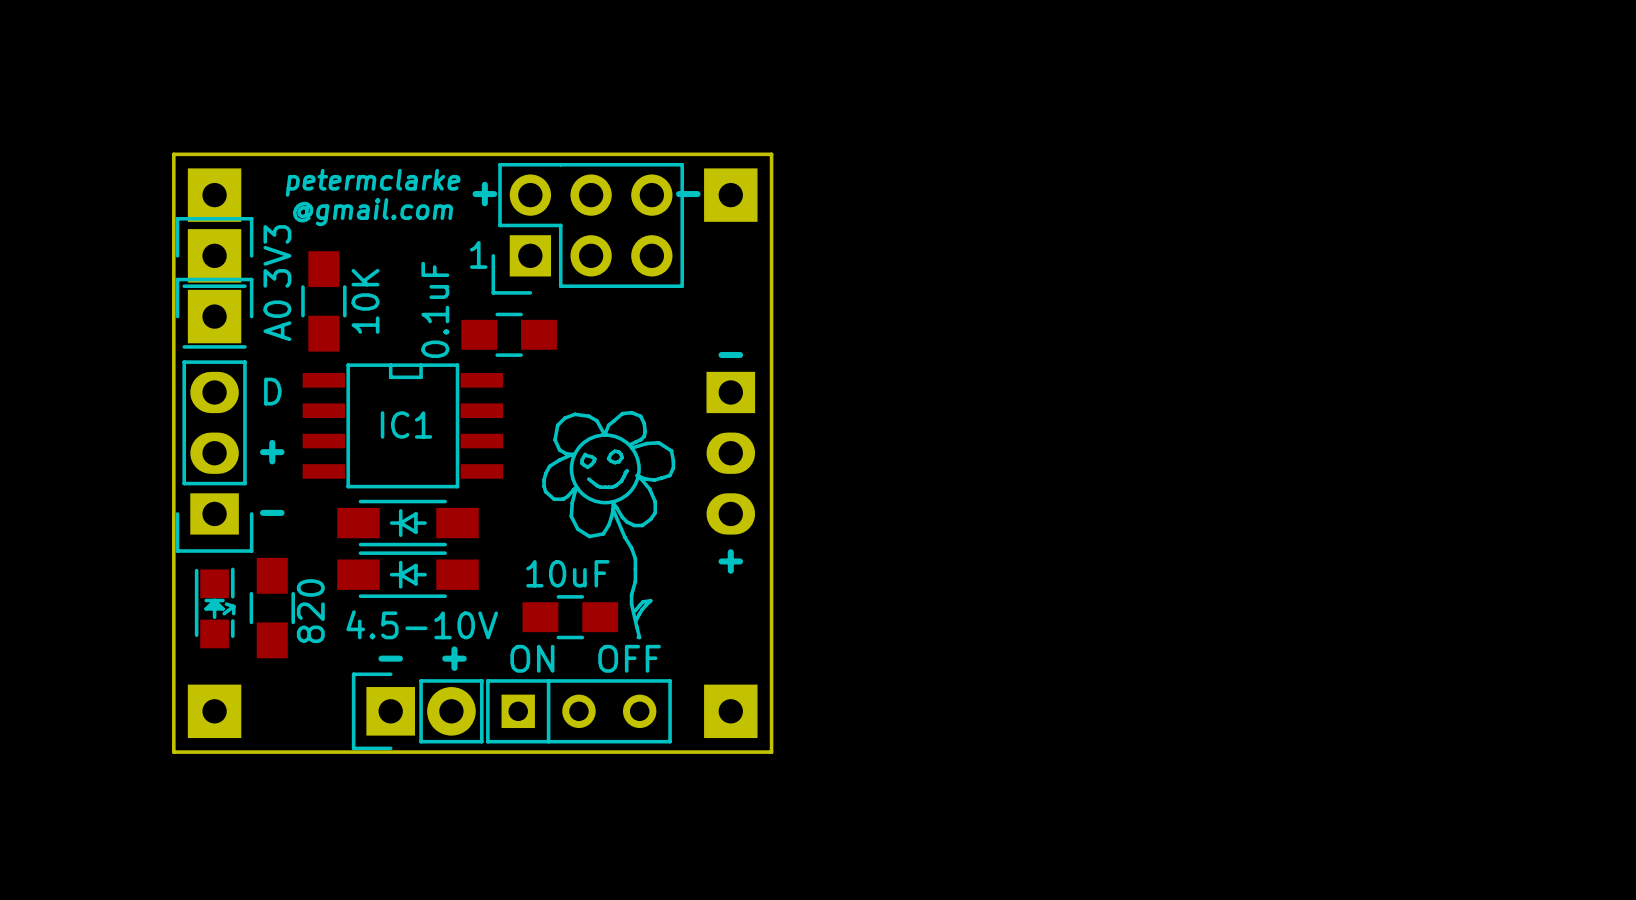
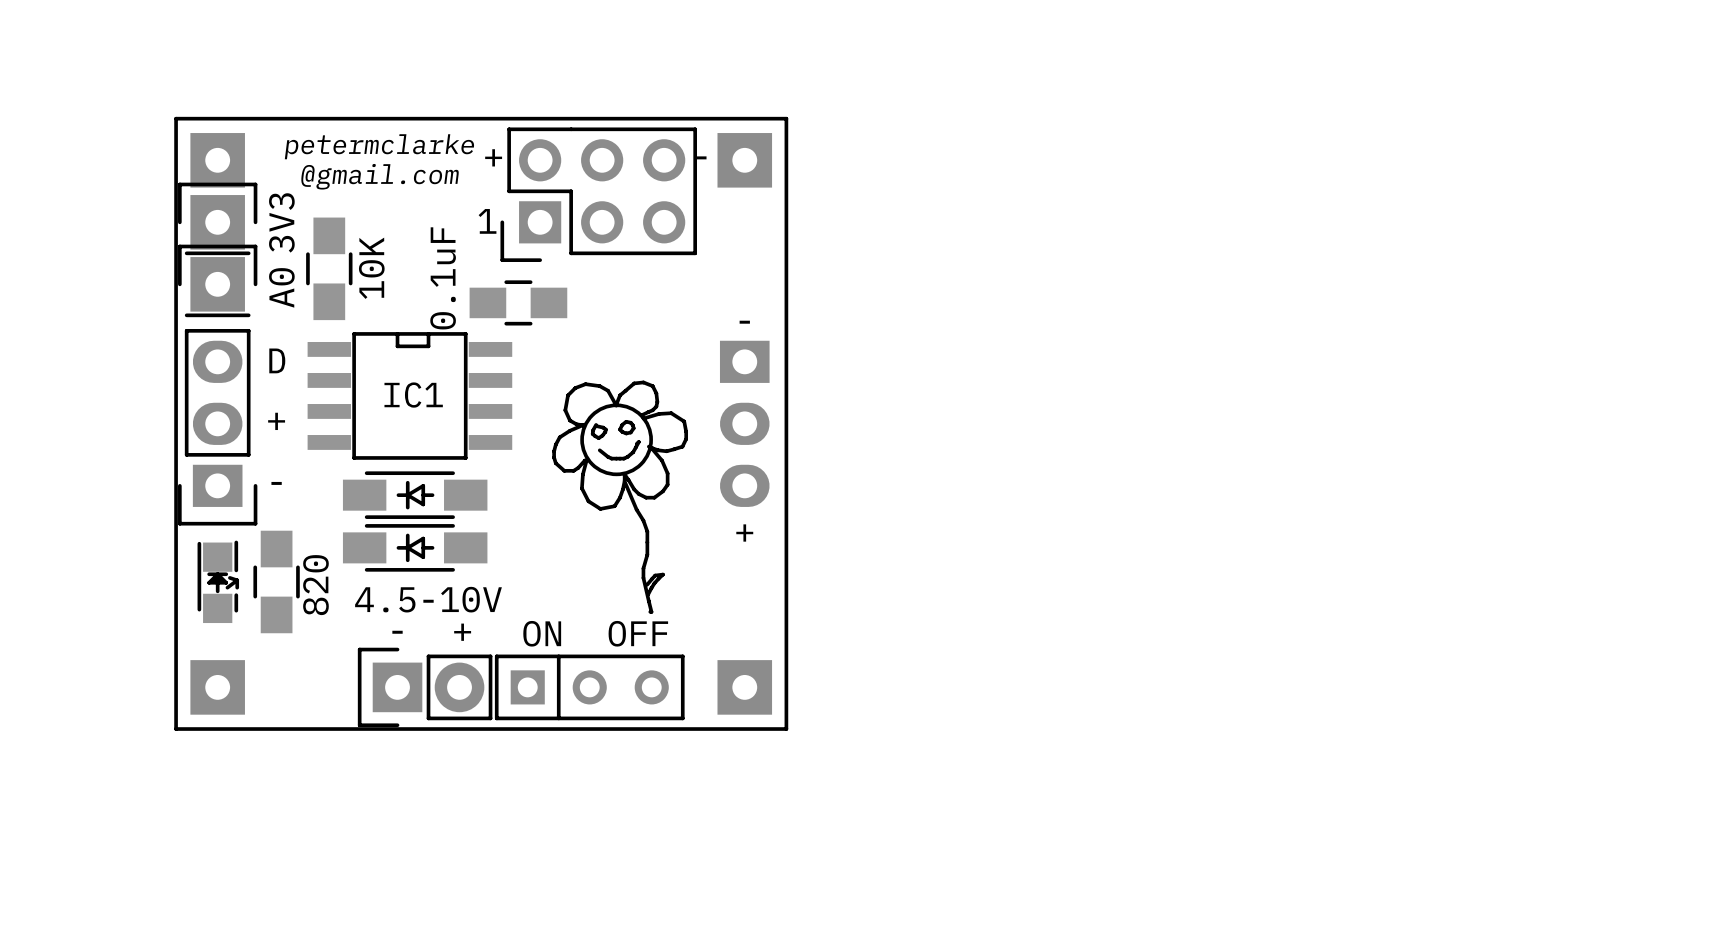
part: 10uF (570, 617) -> none

